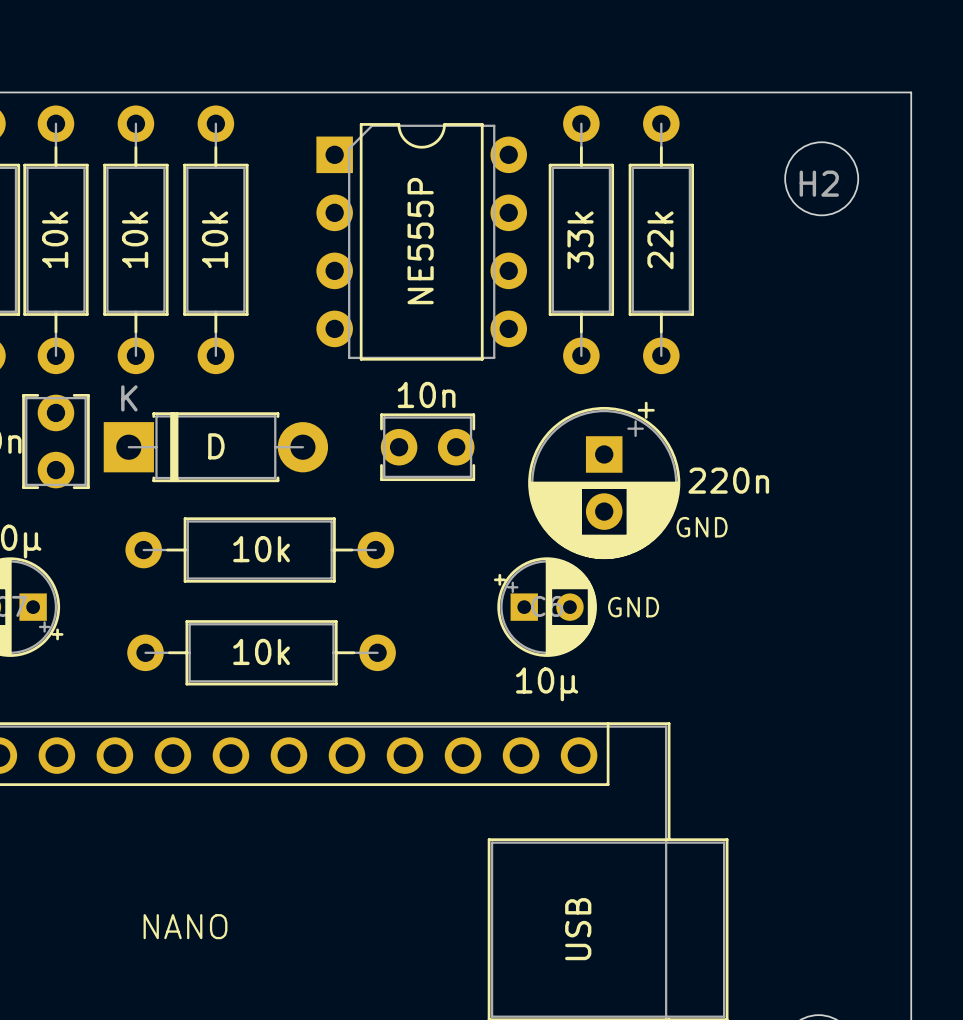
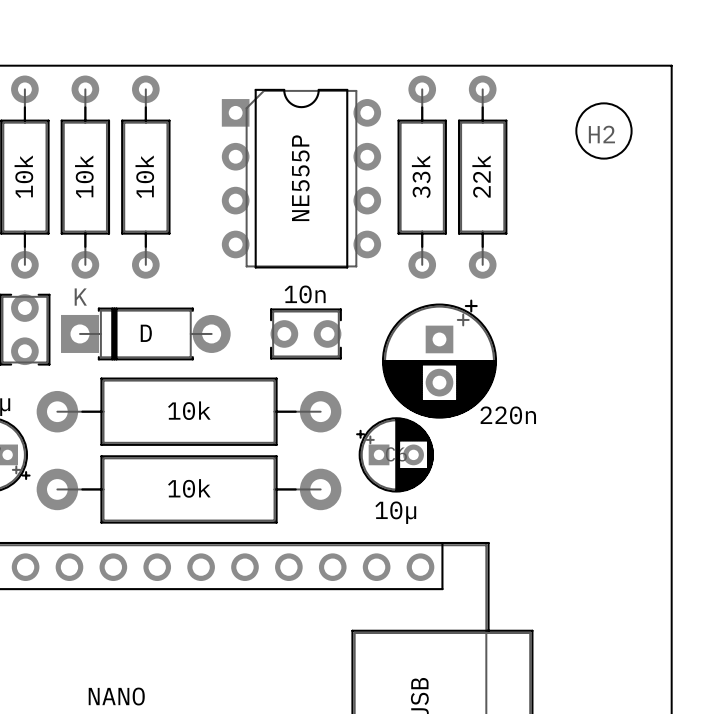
part value position: 220n (728, 480) -> 220n (508, 415)
part footprint: [125, 517, 395, 583] -> [36, 377, 342, 446]
text: GND (702, 527) -> none
part value position: 10k (261, 549) -> 10k (189, 488)
text: GND (633, 607) -> none
part footprint: [127, 620, 396, 686] -> [36, 455, 342, 524]
part value position: 10k (261, 651) -> 10k (189, 410)

